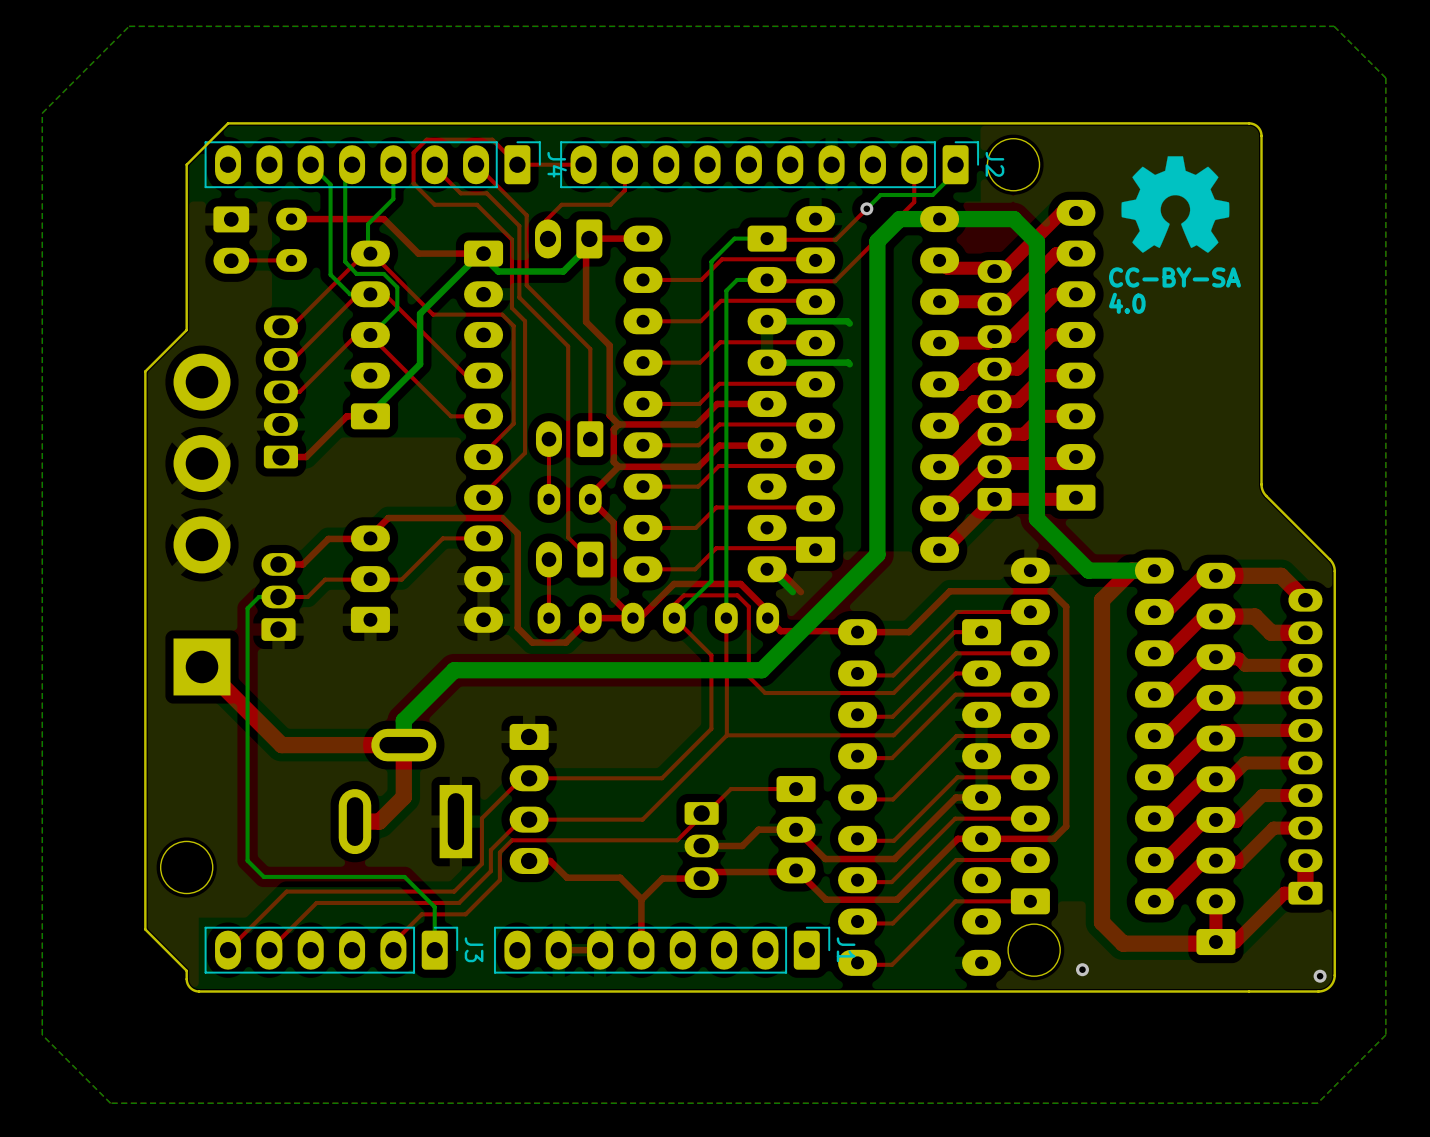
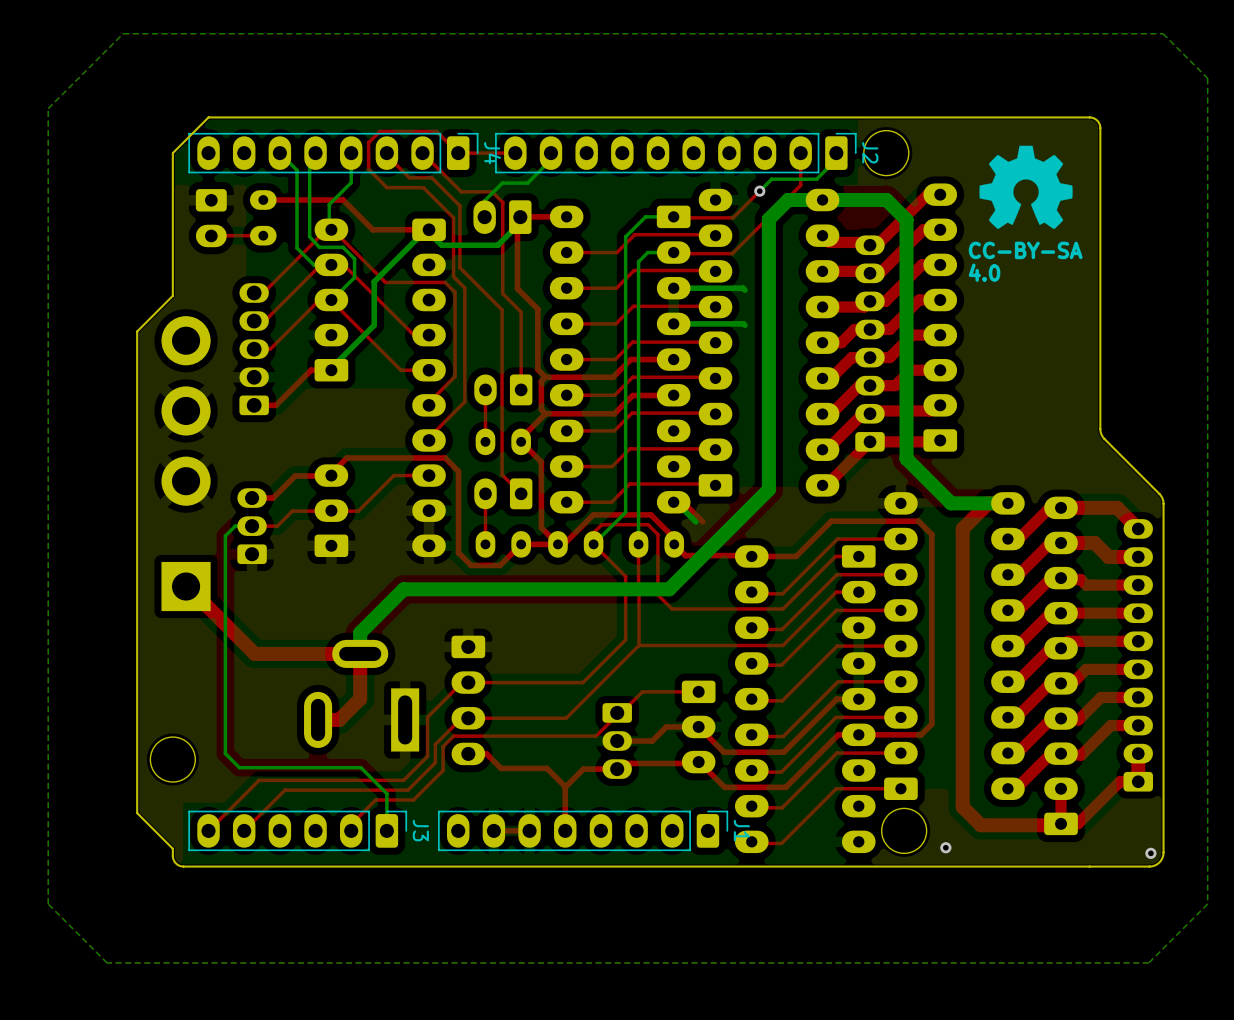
top track: (624, 164) (624, 190) (610, 204) (561, 204) (546, 220) (546, 238) -> none
bottom track: none -> (550, 153) (550, 159) (527, 183) (502, 183) (484, 200) (484, 217)
top track: (520, 209) (526, 215) (526, 285) (569, 327) -> (461, 191) (492, 191) (502, 202) (502, 293)

